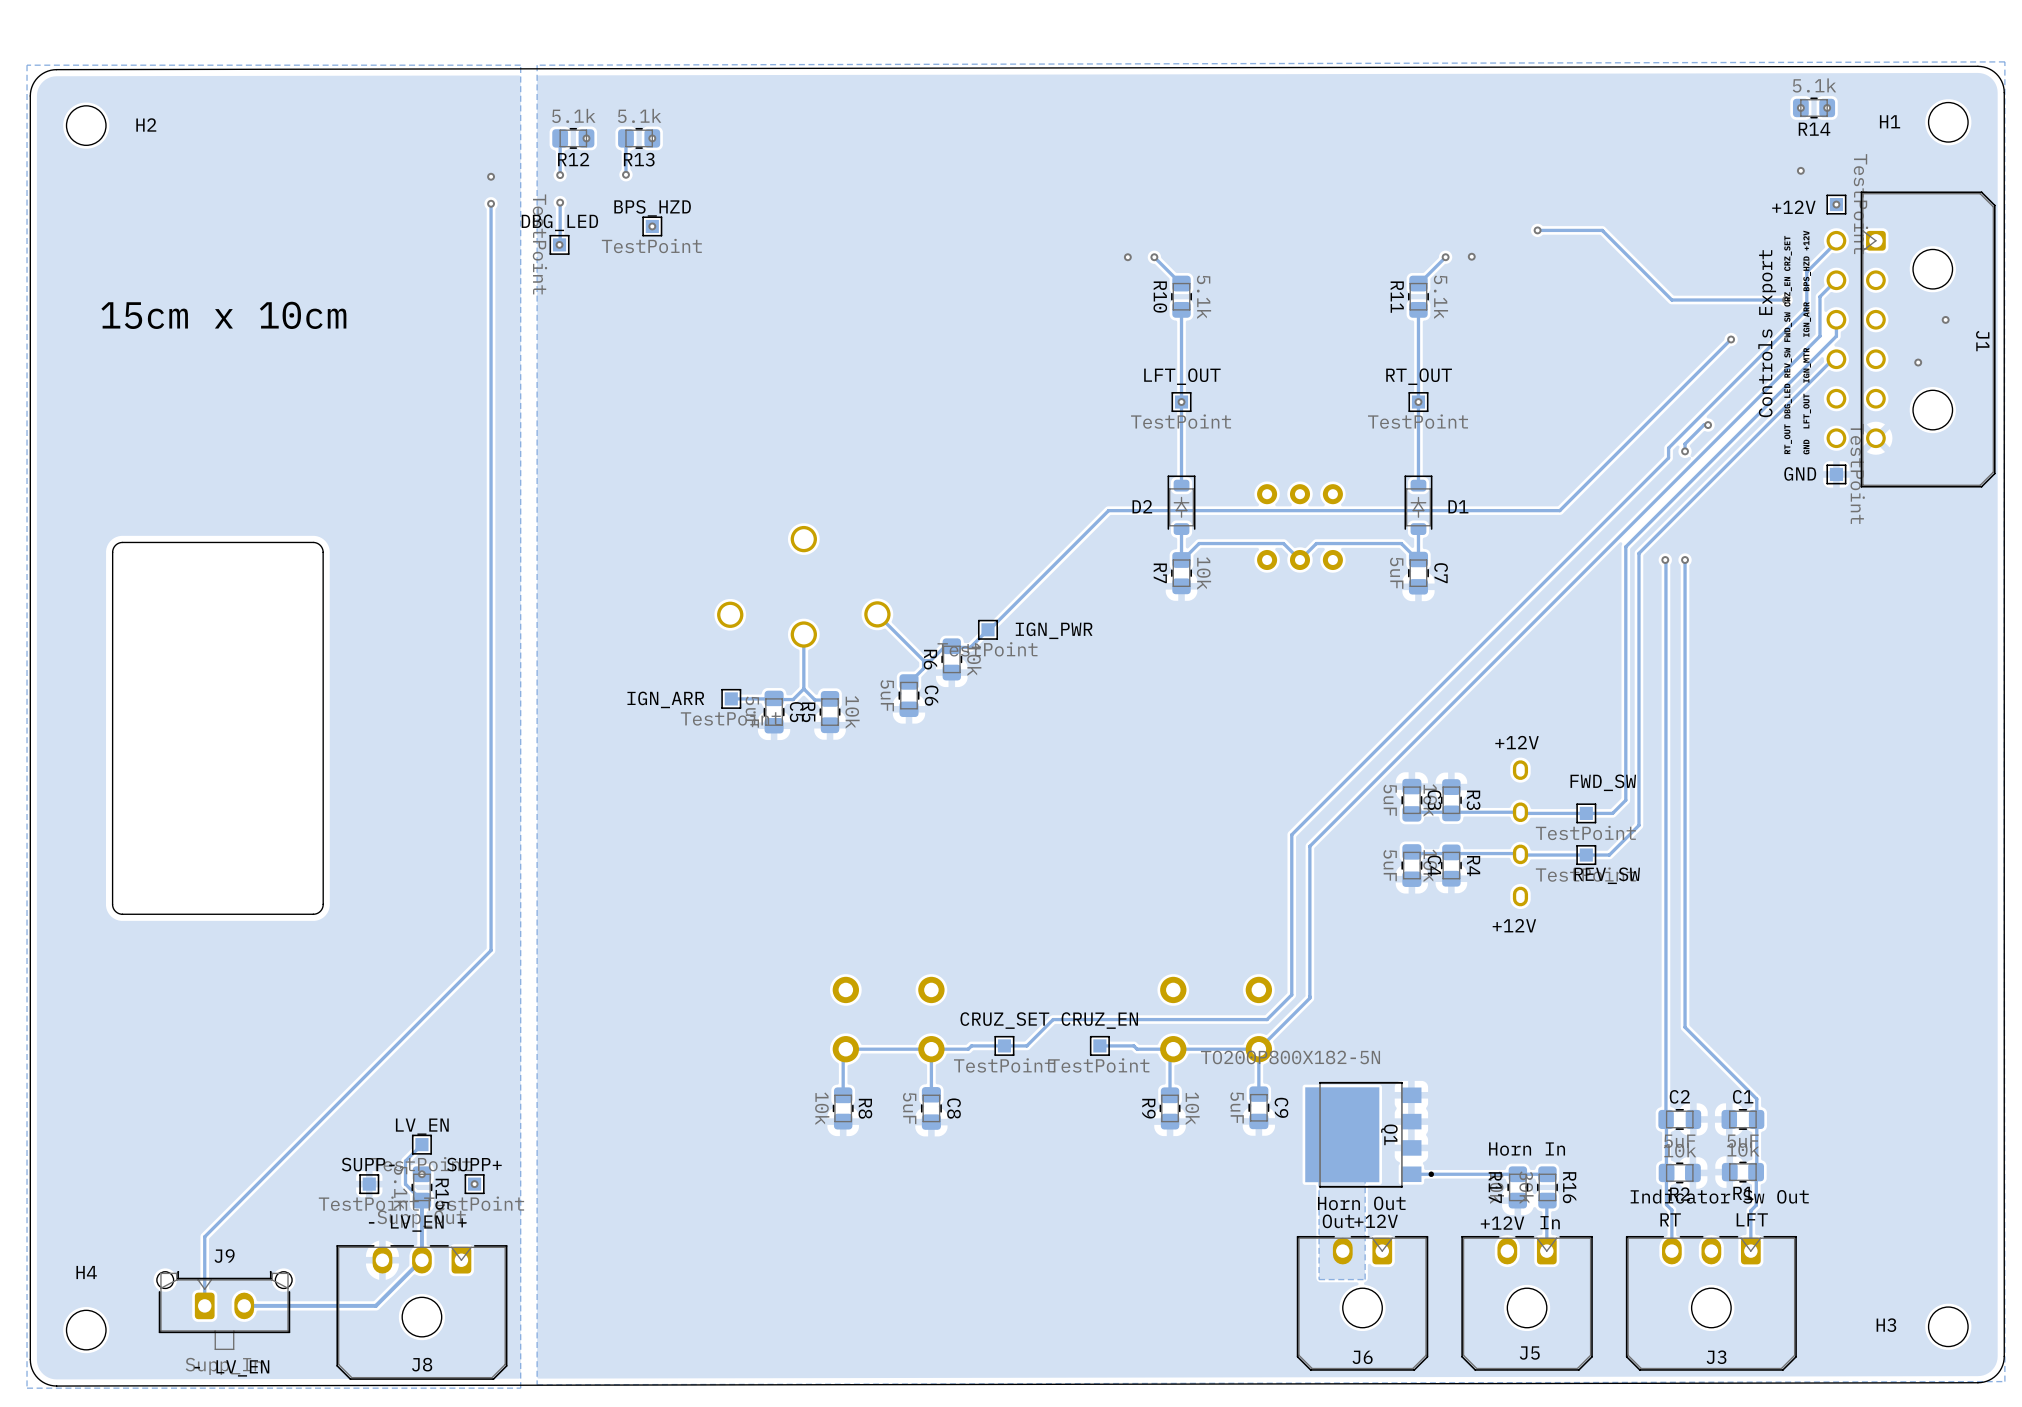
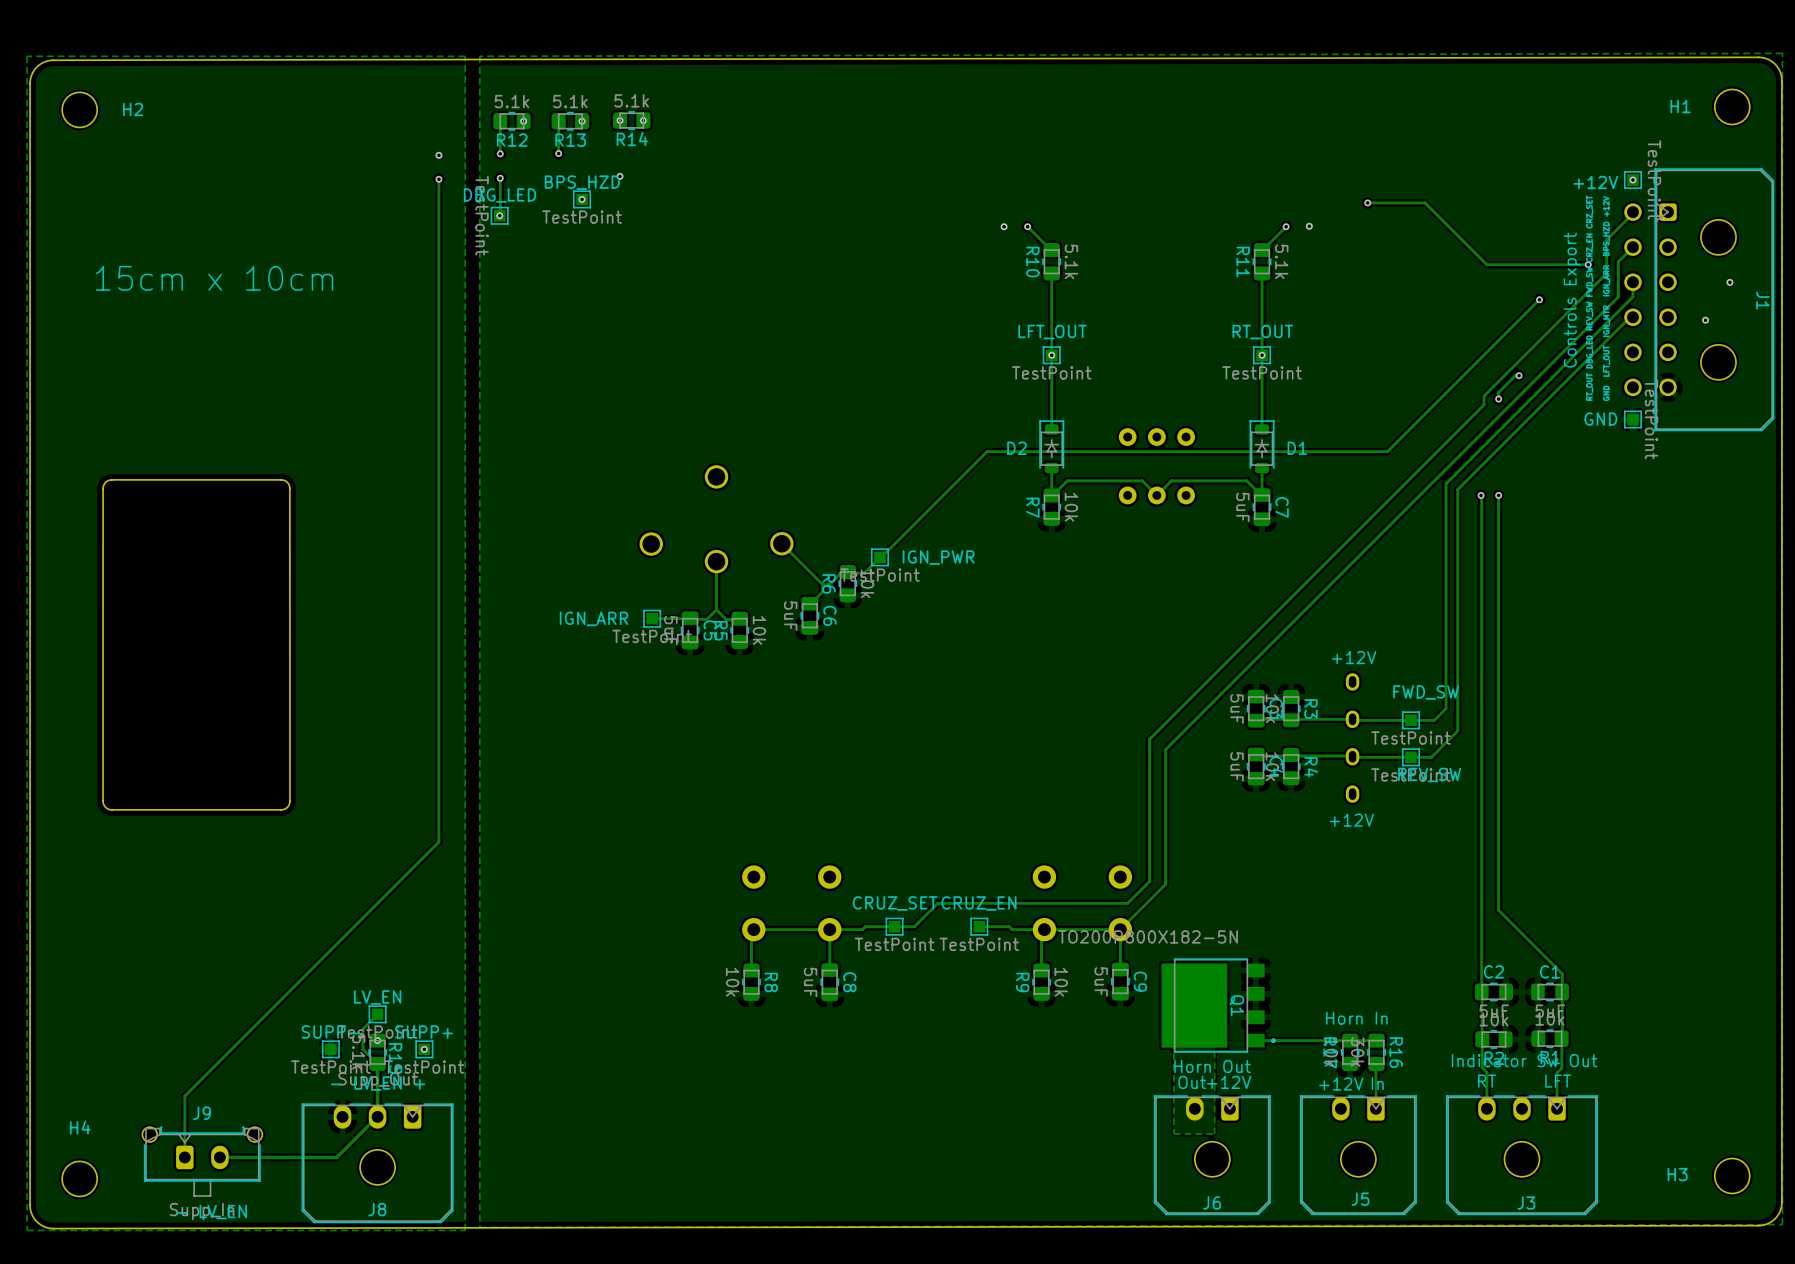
via: (1800, 107) -> none
R14 position: (1814, 107) -> (631, 120)
via: (1827, 107) -> none
via: none -> (620, 120)
via: none -> (643, 120)
via: (1800, 170) -> none
via: none -> (620, 176)

